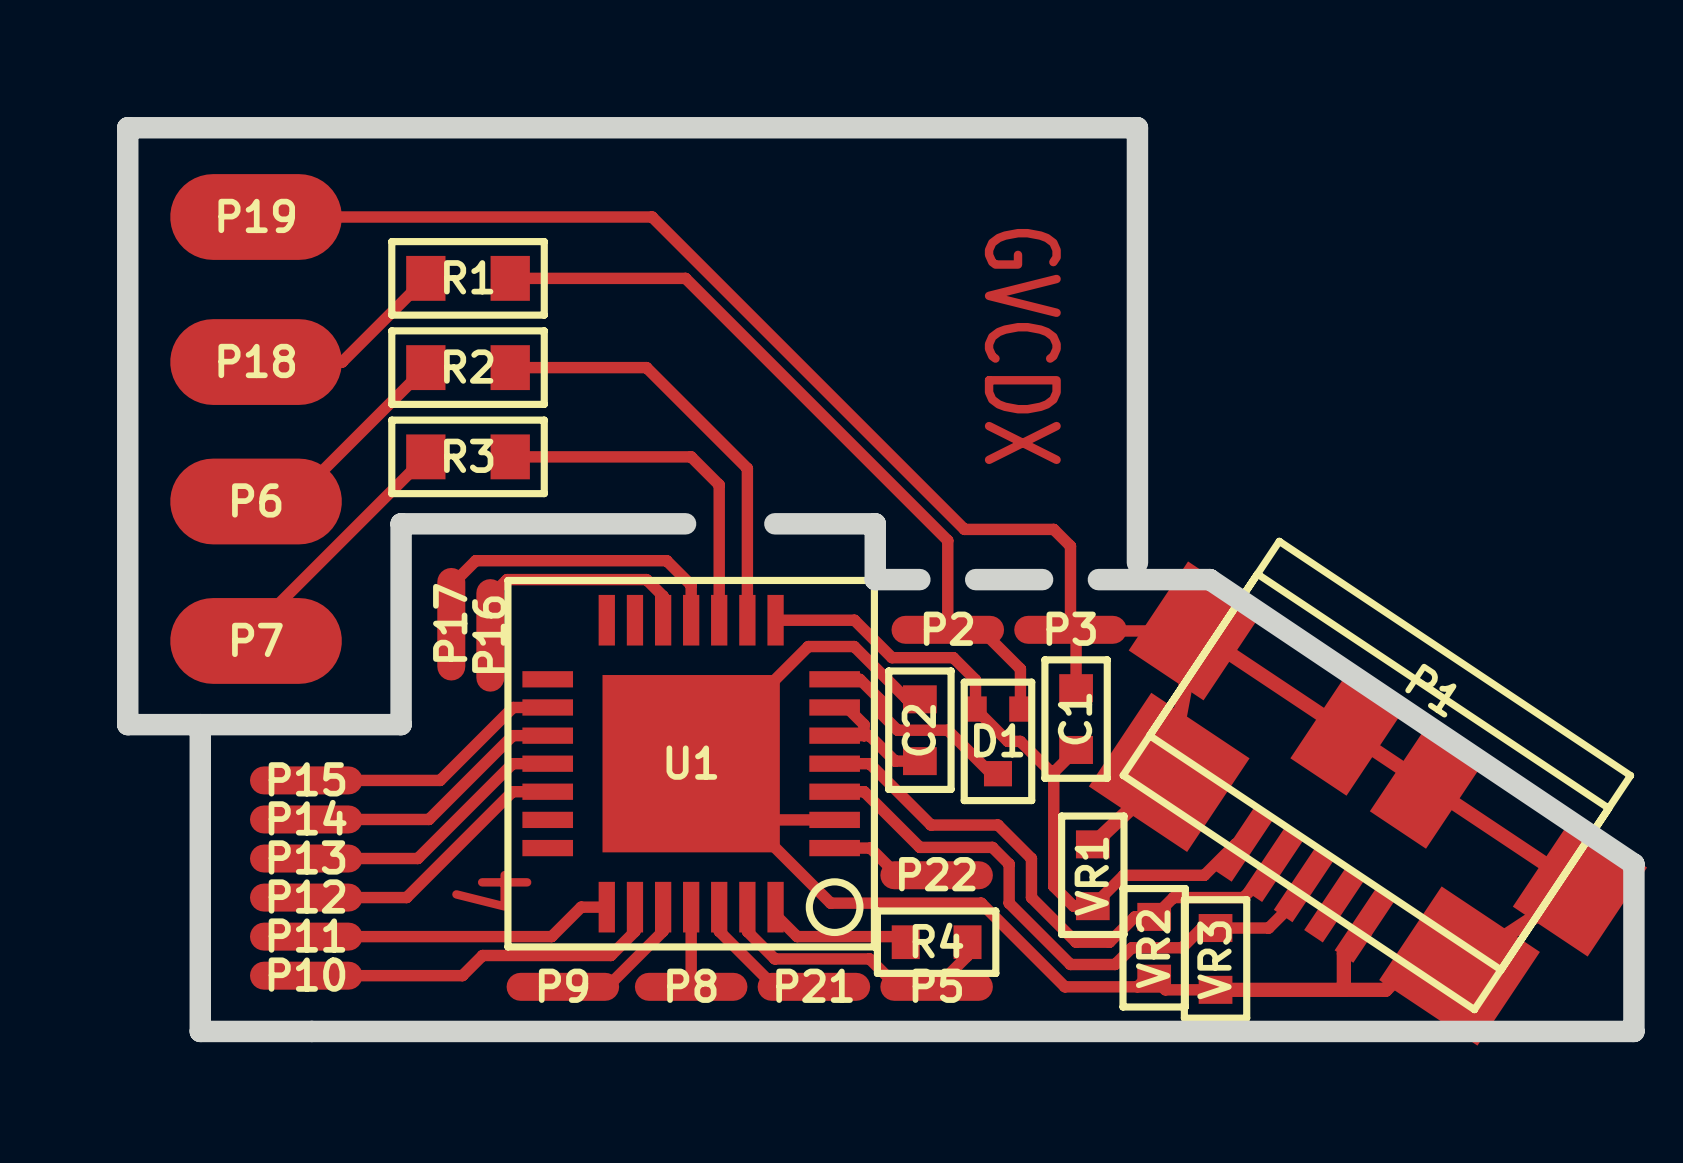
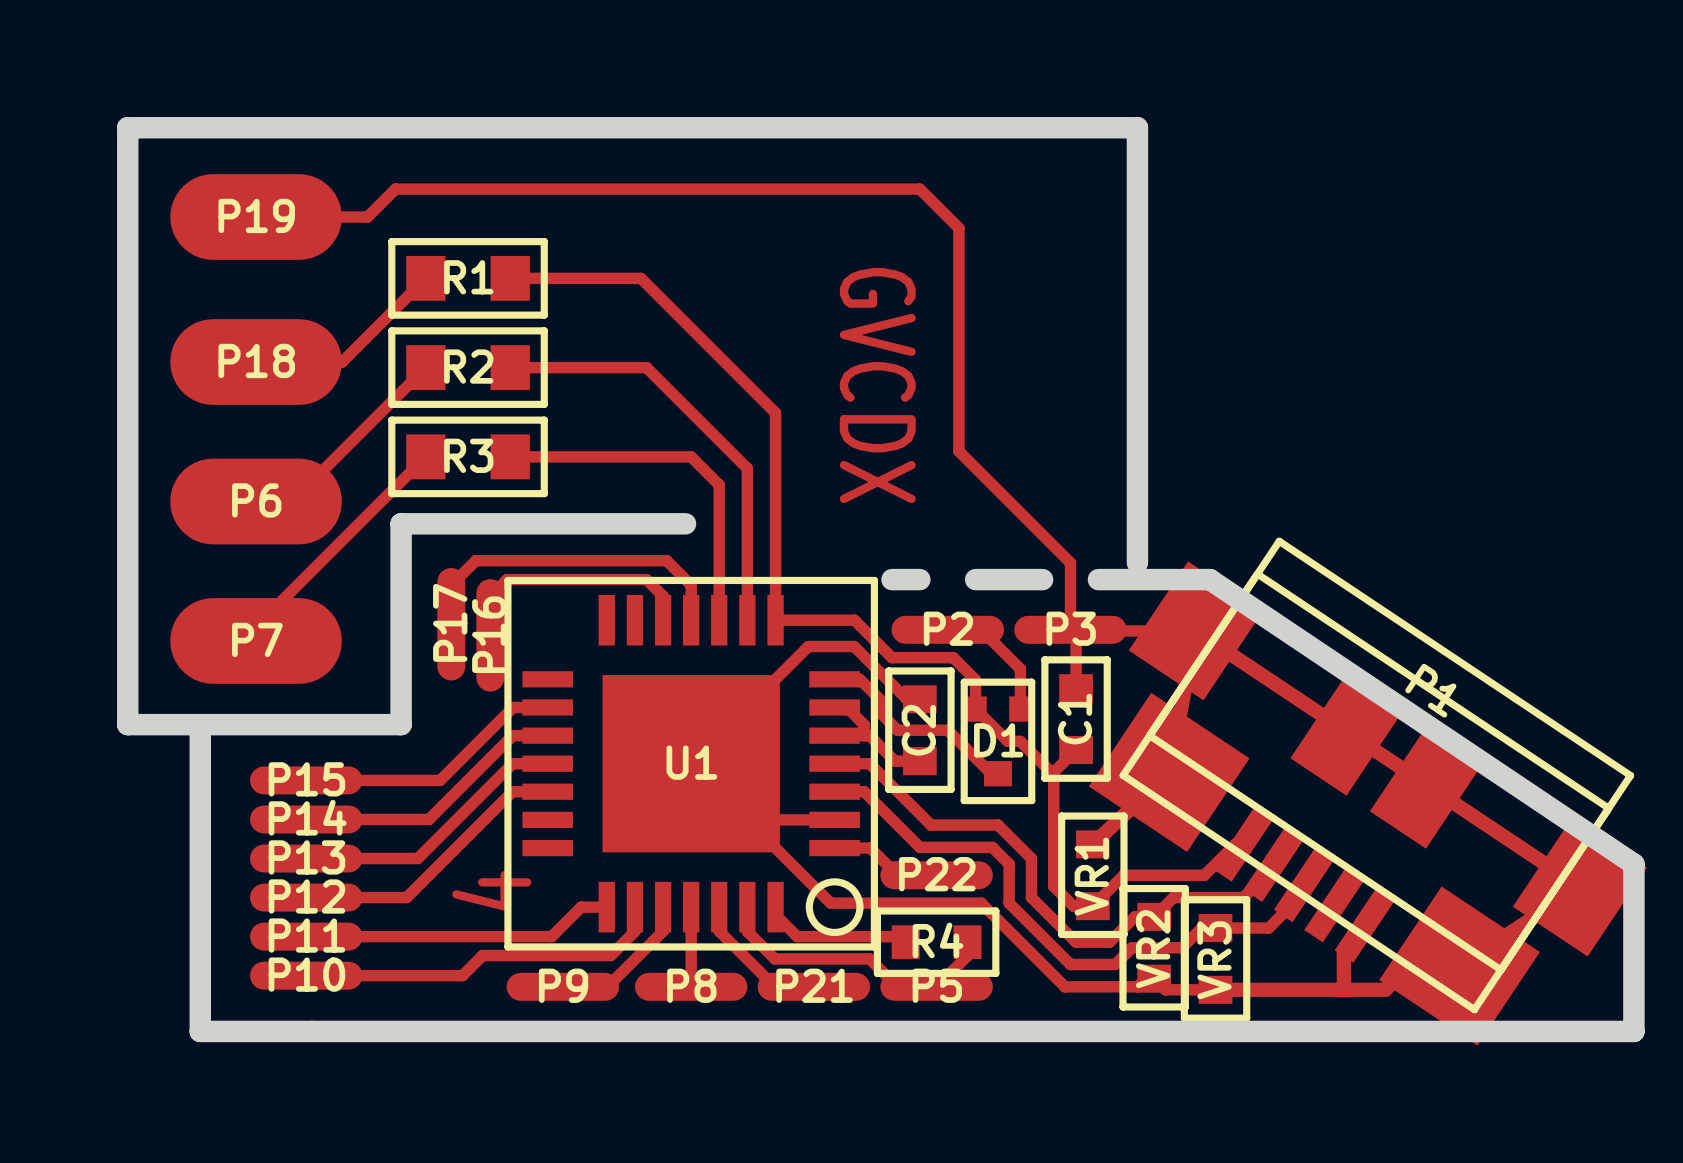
top track: (367, 217) (652, 217) (964, 529) (1053, 529) (1070, 546) (1070, 562) -> (367, 217) (395, 189) (919, 189) (958, 228) (958, 451) (1070, 562)
top track: (640, 278) (685, 278) (947, 540) (947, 629) -> (640, 278) (775, 412) (775, 620)
text position: GVCDX (1022, 346) -> GVCDX (877, 385)
board edge: (774, 523) (875, 523) (875, 579) (891, 579) -> none

